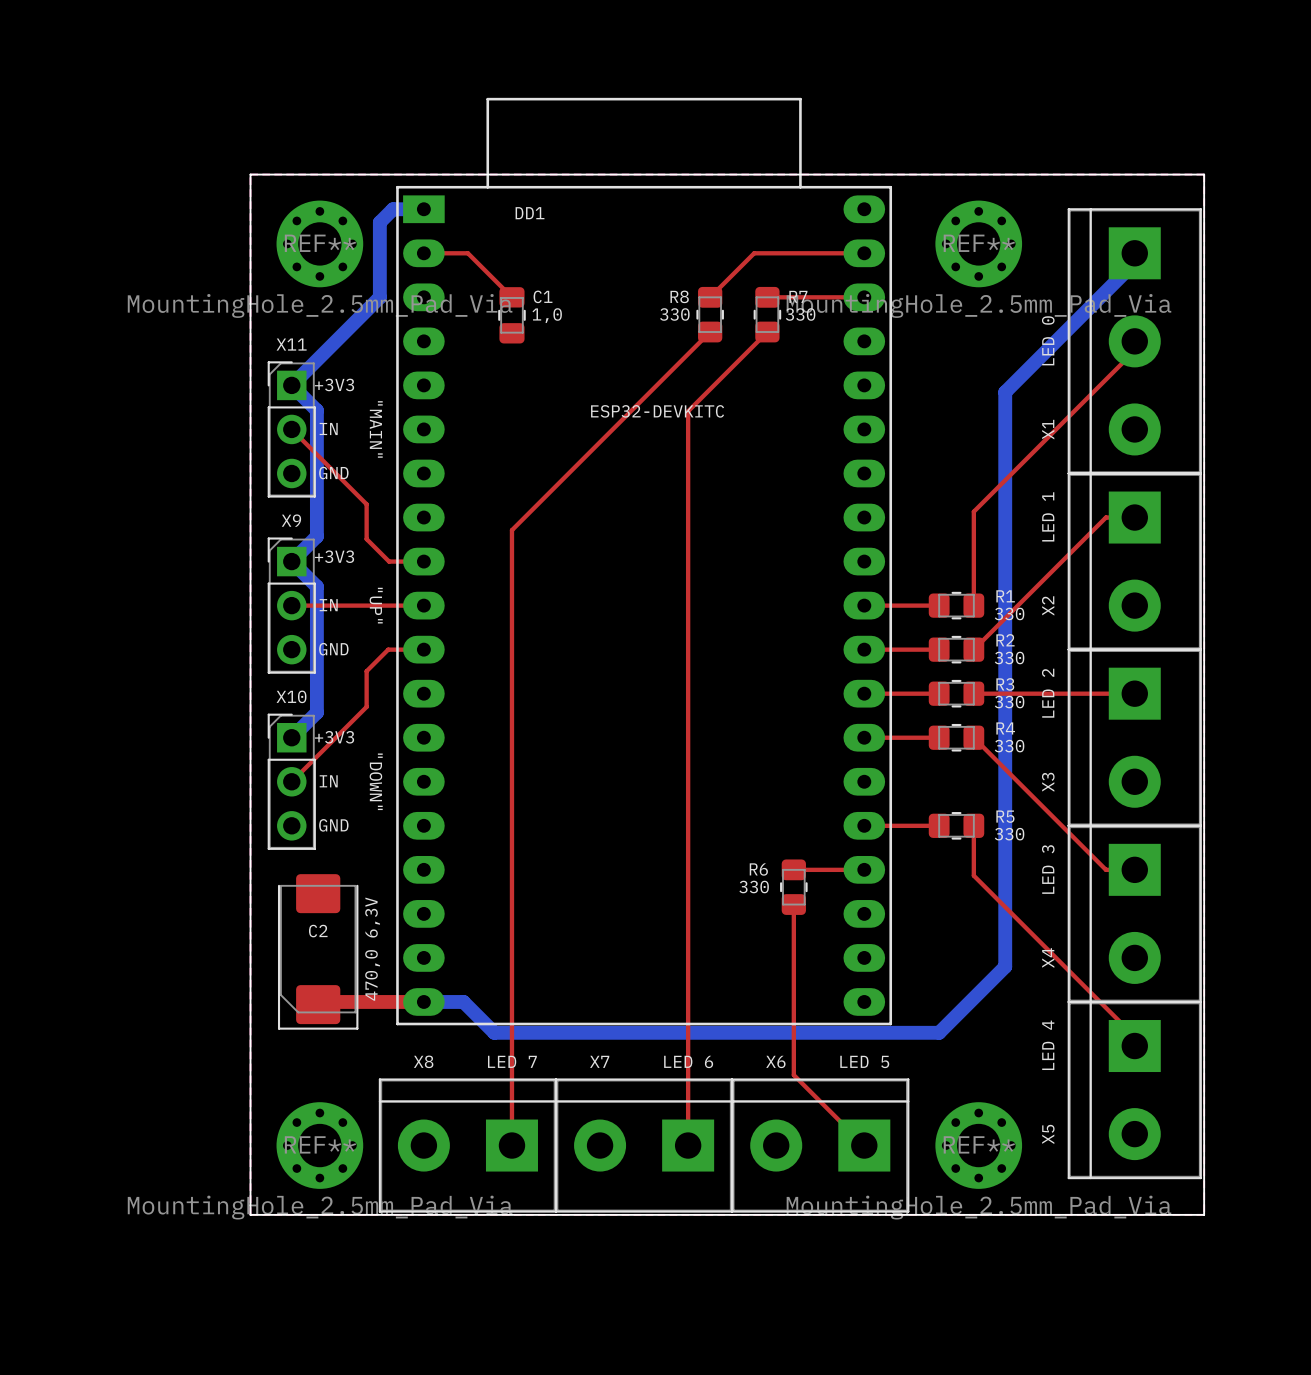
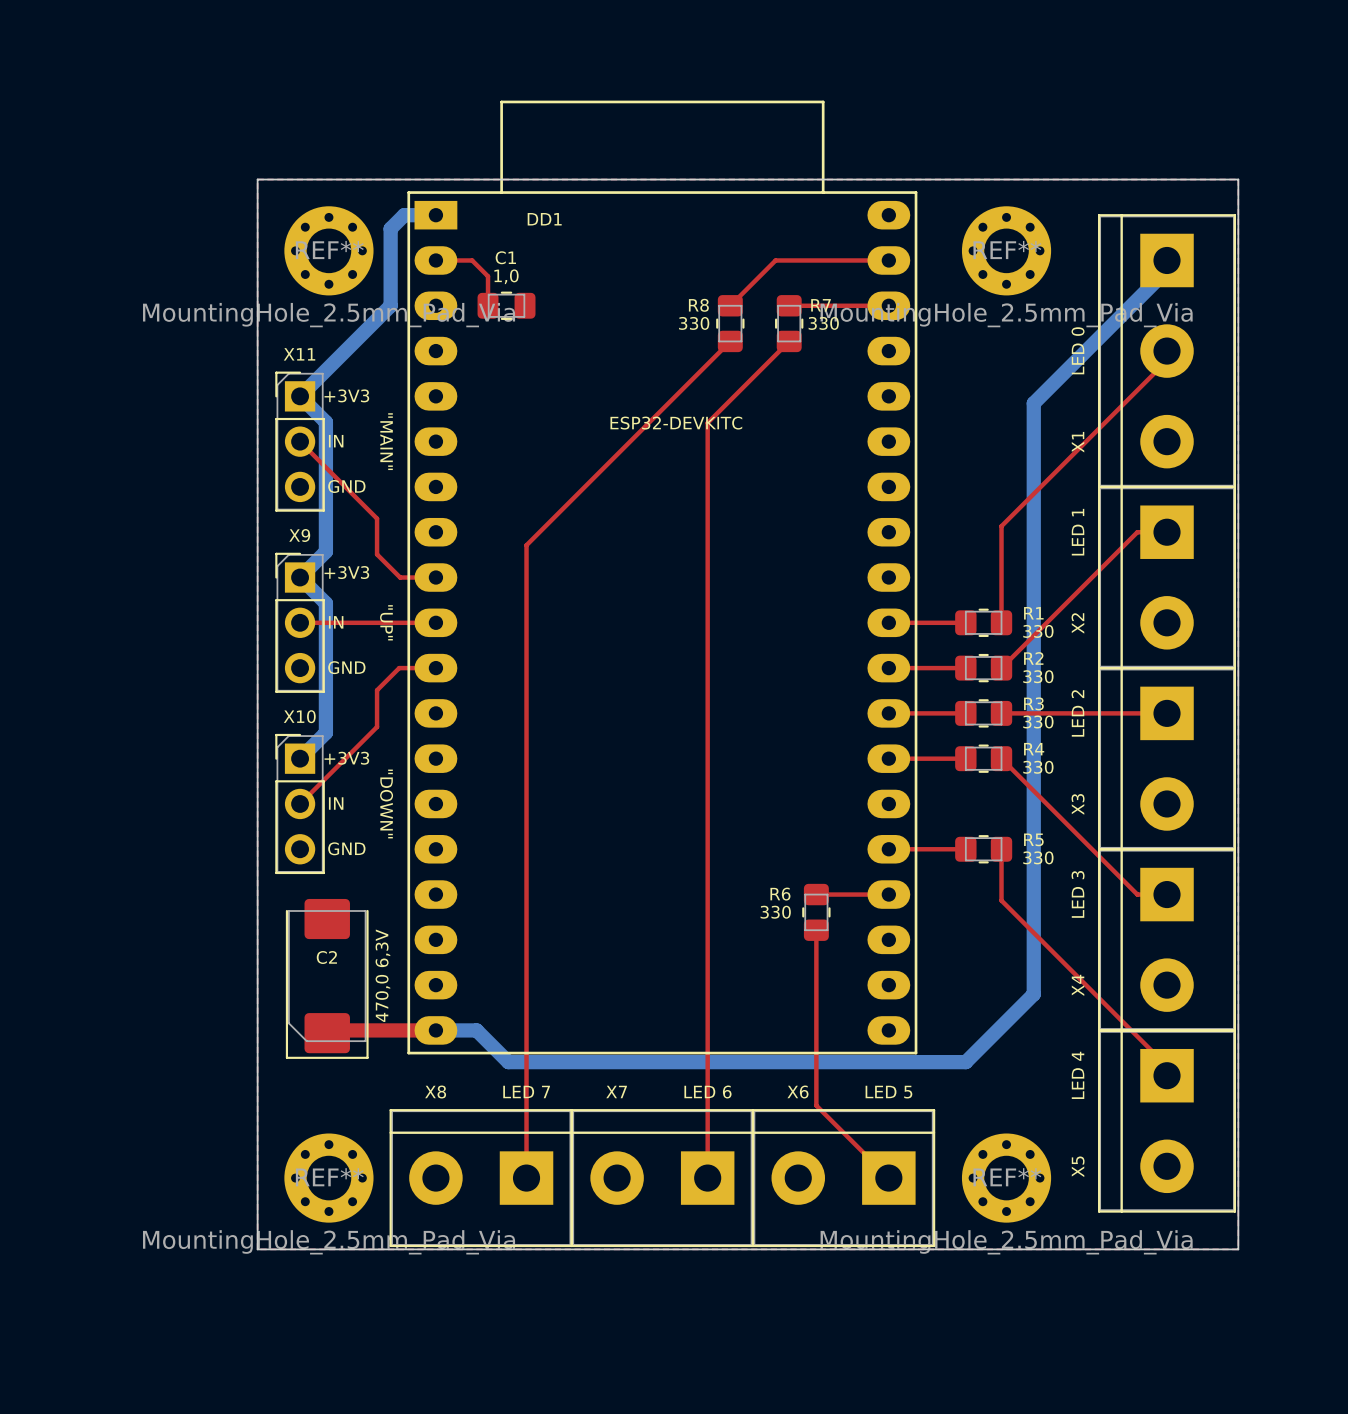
top track: (459, 253) (467, 253) (511, 297) -> (472, 260) (488, 276) (488, 301)
C1 name position: C1 (543, 296) -> C1 (505, 257)
C1 rotation: 0° (511, 315) -> 90° clockwise (506, 305)
C1 value position: 1,0 (547, 315) -> 1,0 (506, 276)

